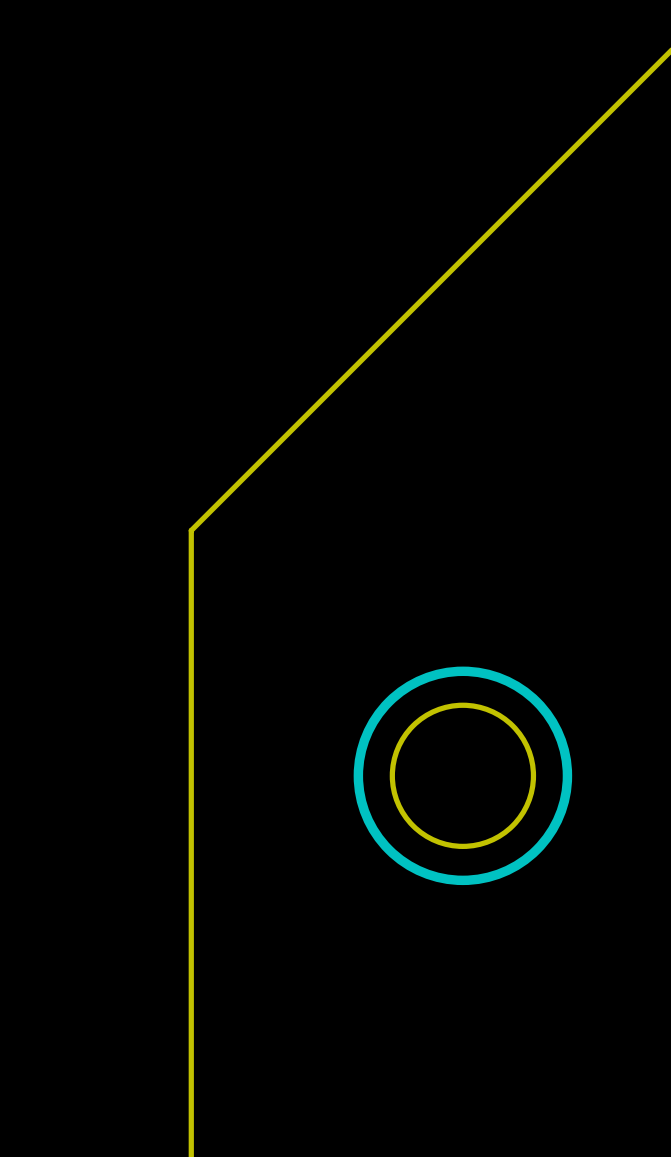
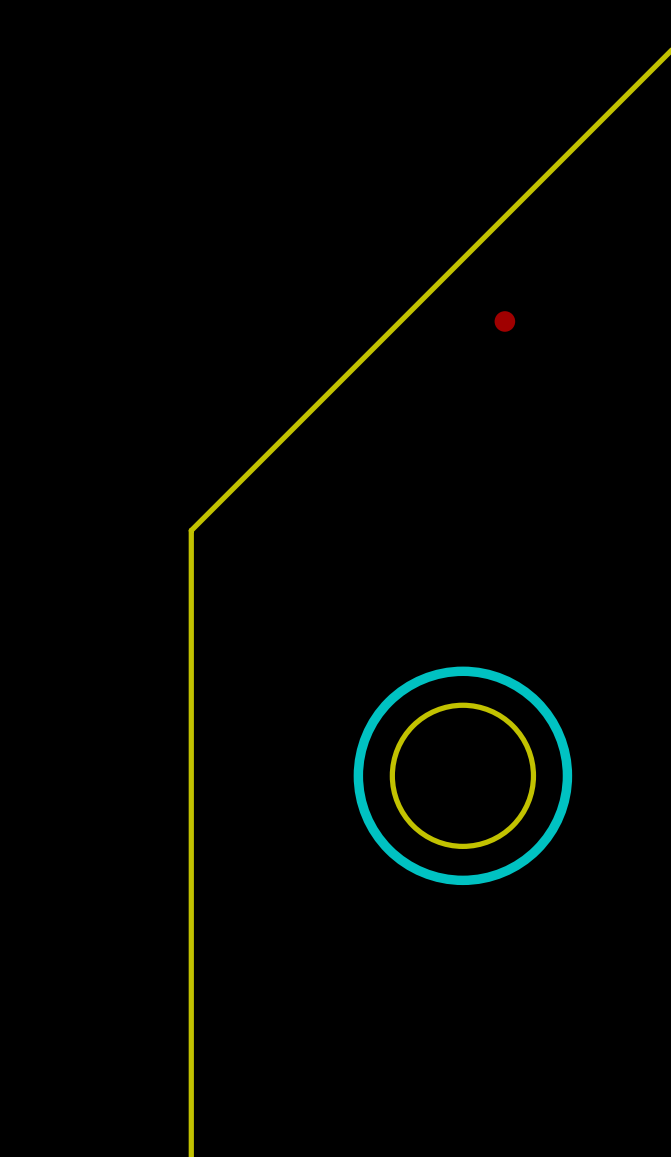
part: none -> (504, 321)

